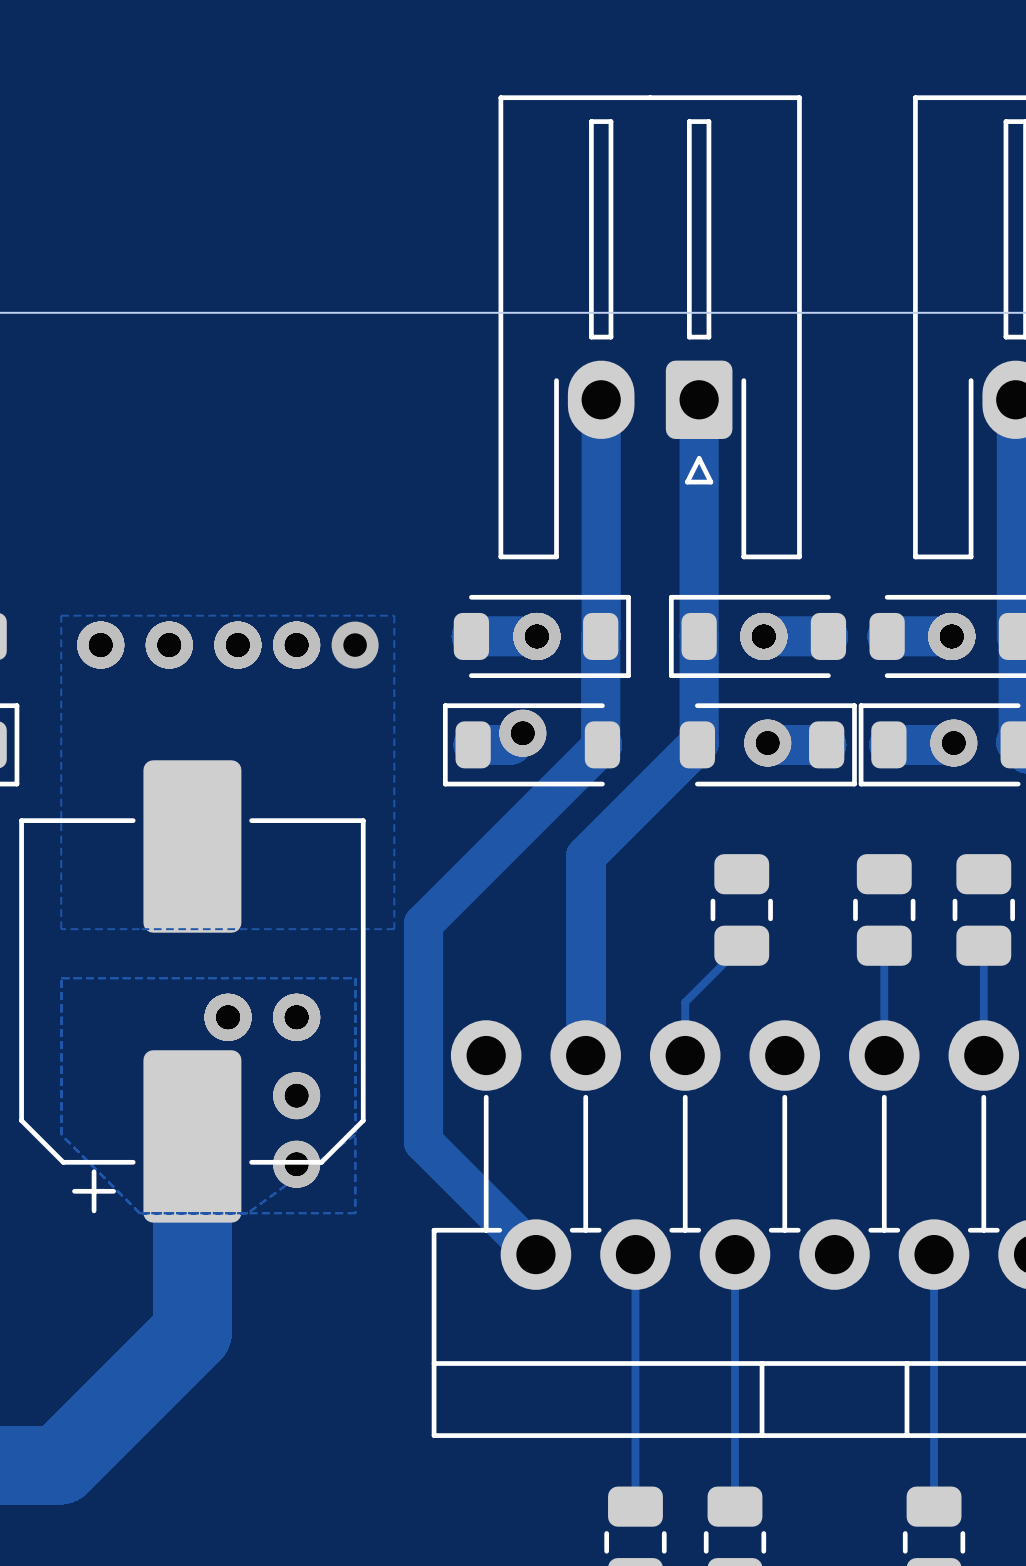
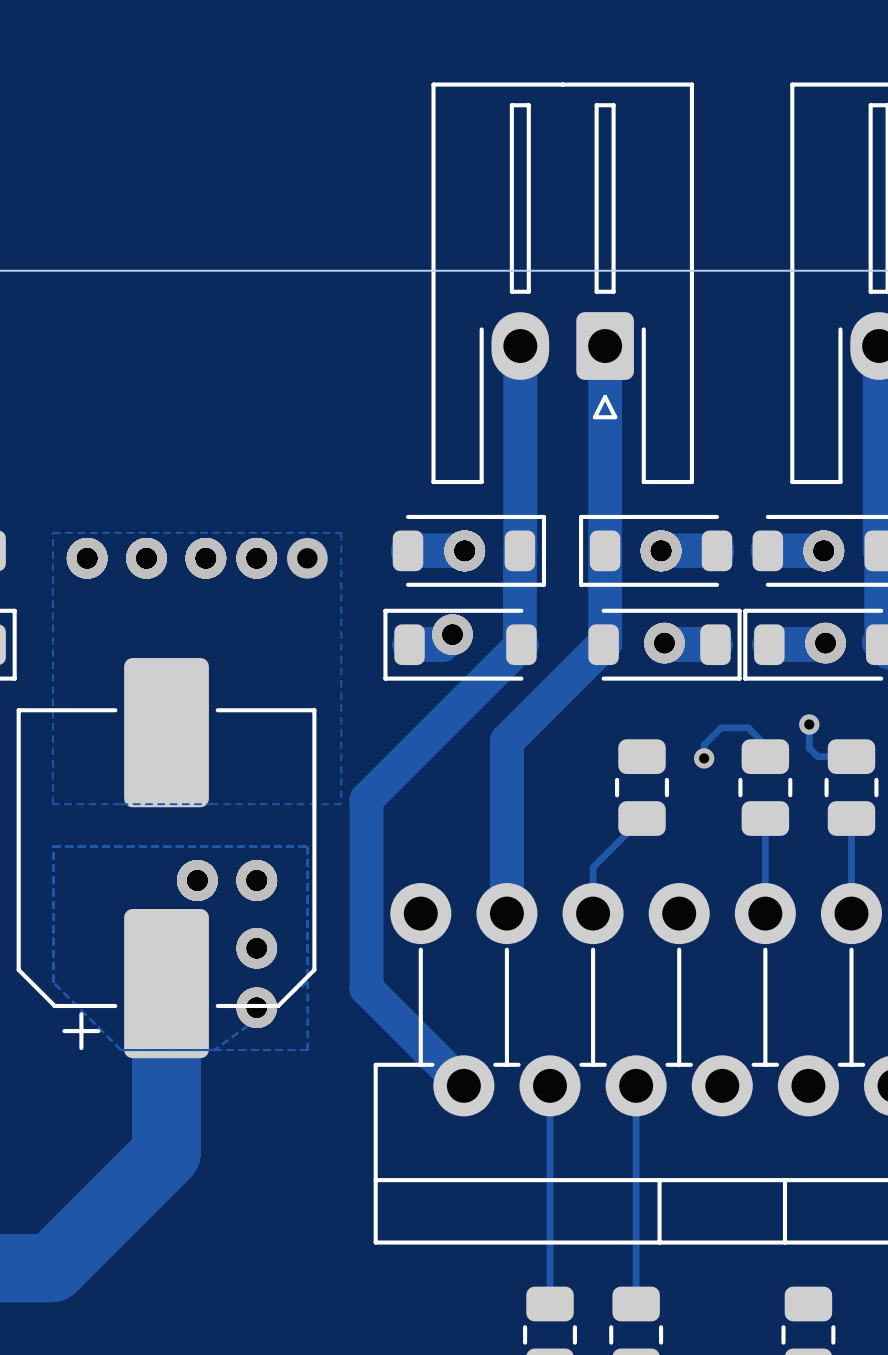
track: none -> (809, 724) (809, 748) (817, 756) (851, 756)
via: none -> (809, 724)
track: none -> (765, 756) (765, 745) (748, 727) (721, 727) (704, 744) (704, 758)
via: none -> (704, 758)
track: (934, 1254) (934, 1506) -> none

